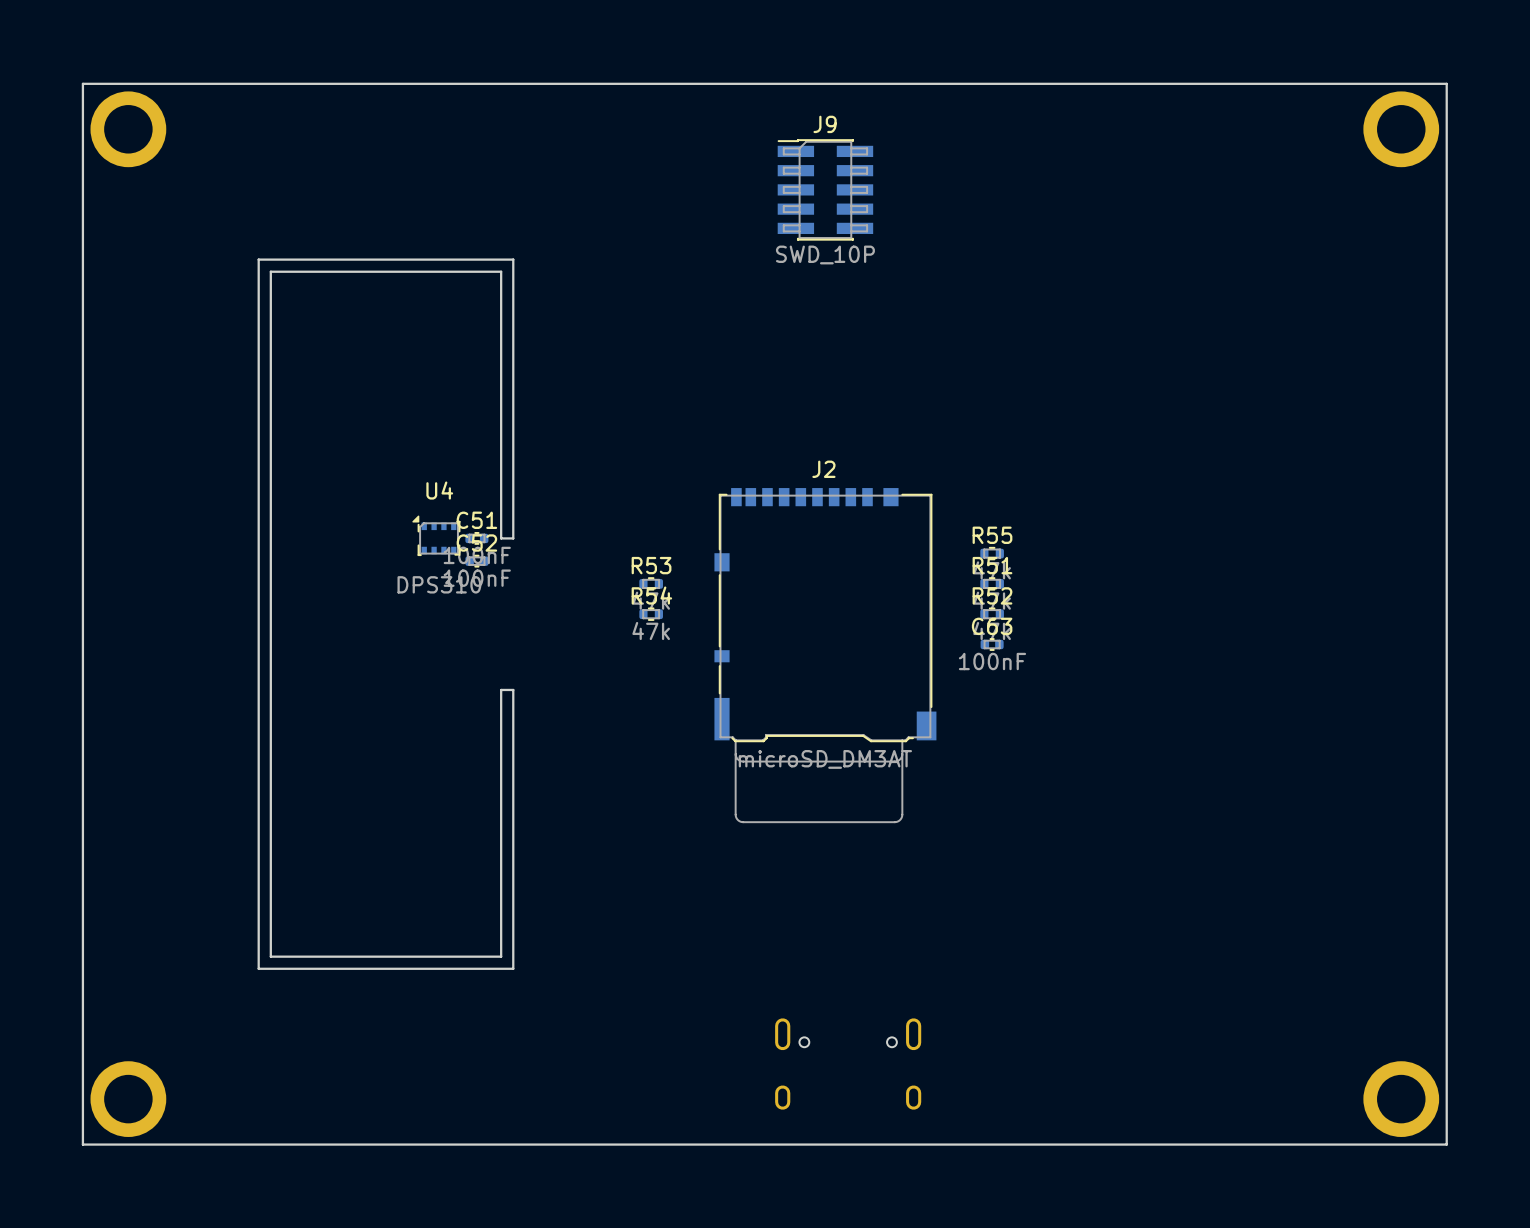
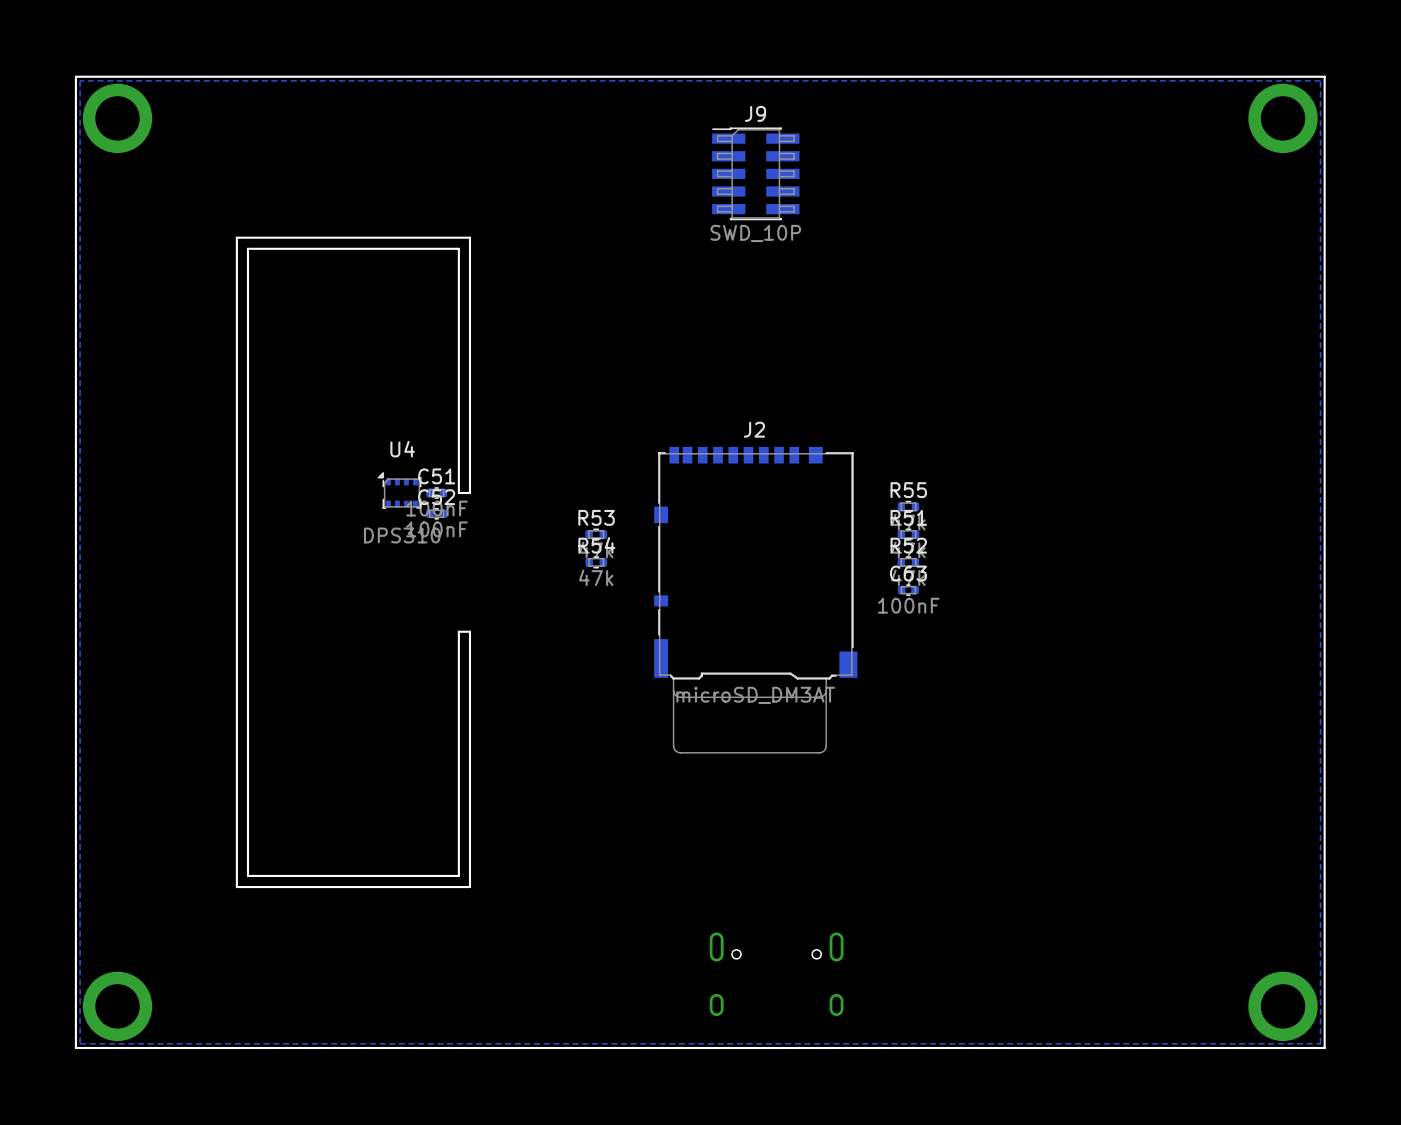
zone outline: none -> (1320, 80) (80, 80) (80, 1043) (1320, 1043) (1320, 80)

